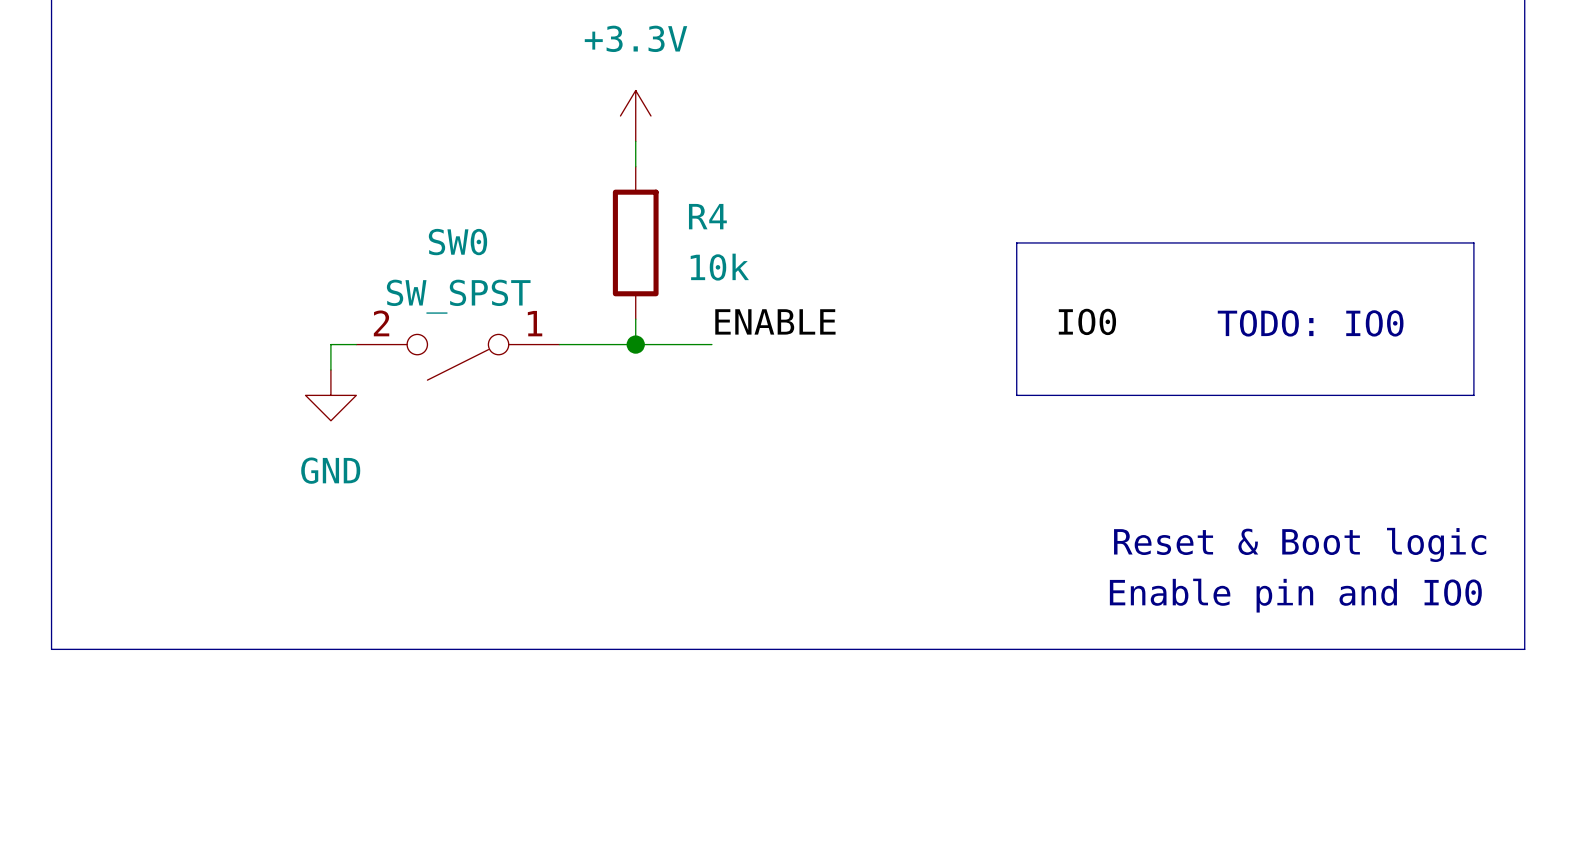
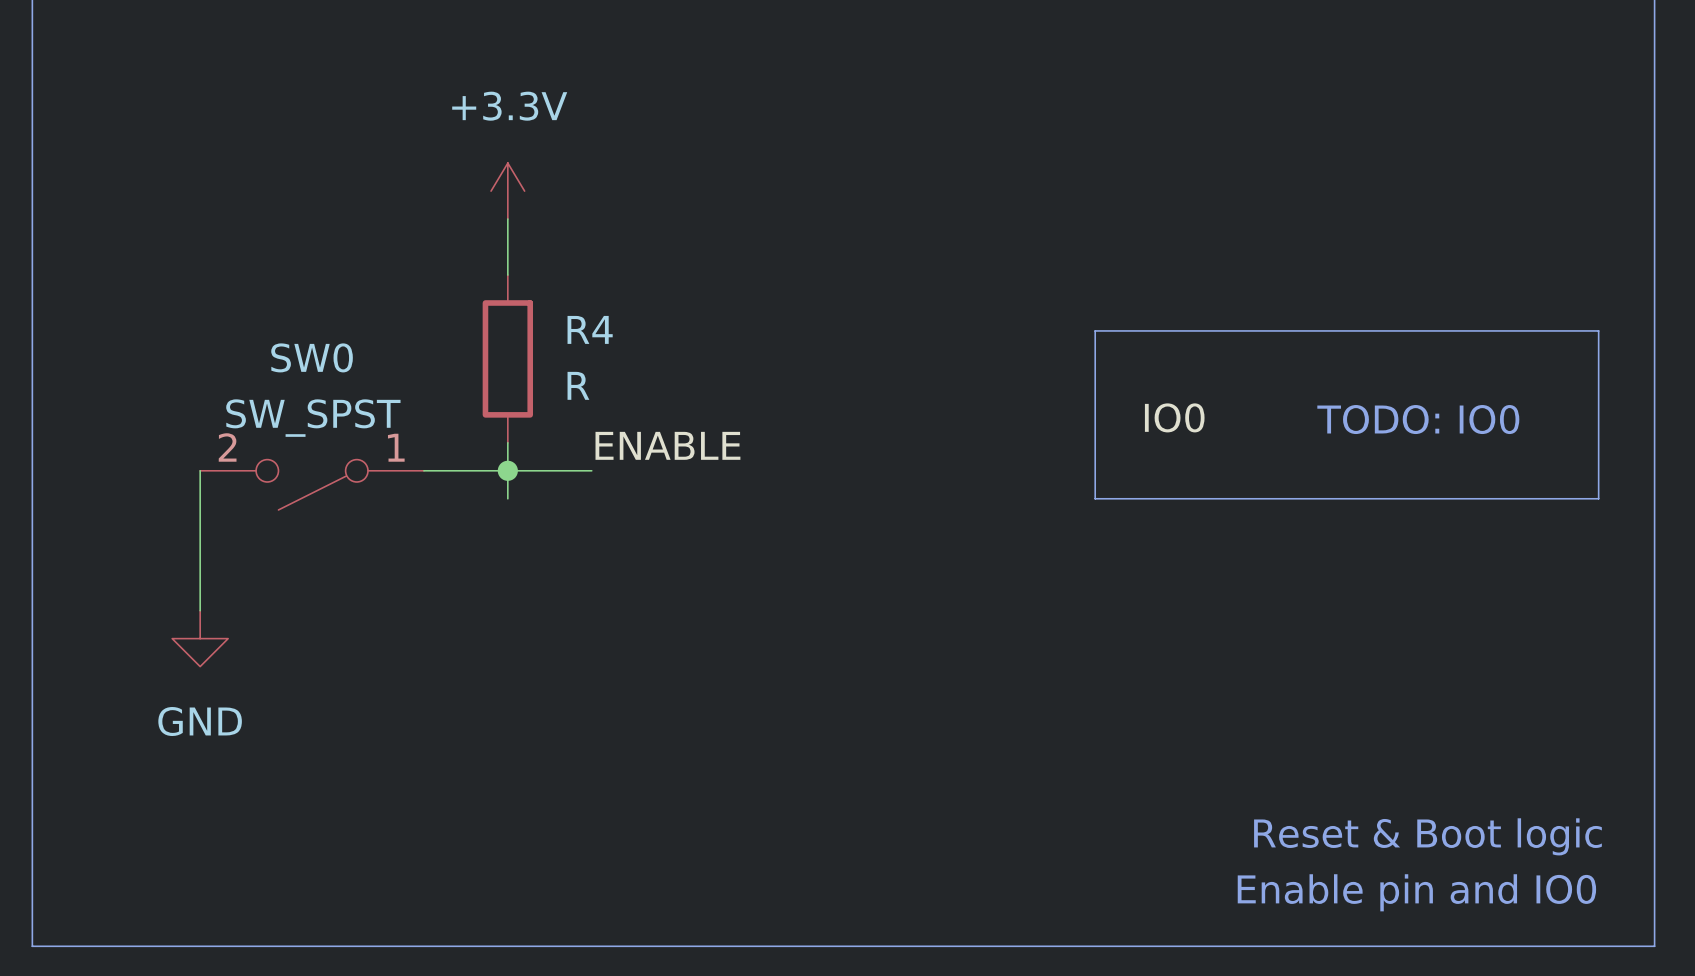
power symbol position: +3.3V (635, 115) -> +3.3V (507, 191)
wire: none -> (507, 219) (507, 275)
wire: (635, 141) (635, 166) -> none
R4 position: (635, 242) -> (507, 358)
R4 value: 10k (719, 267) -> R (578, 385)
wire: (635, 319) (635, 344) -> none
label position: ENABLE (775, 321) -> ENABLE (667, 445)
wire: (356, 344) (330, 344) (330, 369) -> none
wire: none -> (507, 442) (507, 498)
wire: (559, 344) (711, 344) -> (423, 470) (591, 470)
junction: (635, 344) -> none
SW0 position: (457, 357) -> (312, 484)
wire: none -> (200, 470) (200, 610)
junction: none -> (507, 470)
power symbol position: GND (330, 395) -> GND (200, 638)
text position: Reset & Boot logic (1300, 544) -> Reset & Boot logic (1427, 836)
text position: Enable pin and IO0 (1295, 595) -> Enable pin and IO0 (1416, 892)
line: (51, 649) (1524, 649) -> (32, 778) (32, 946) (1654, 946) (1654, 778)

